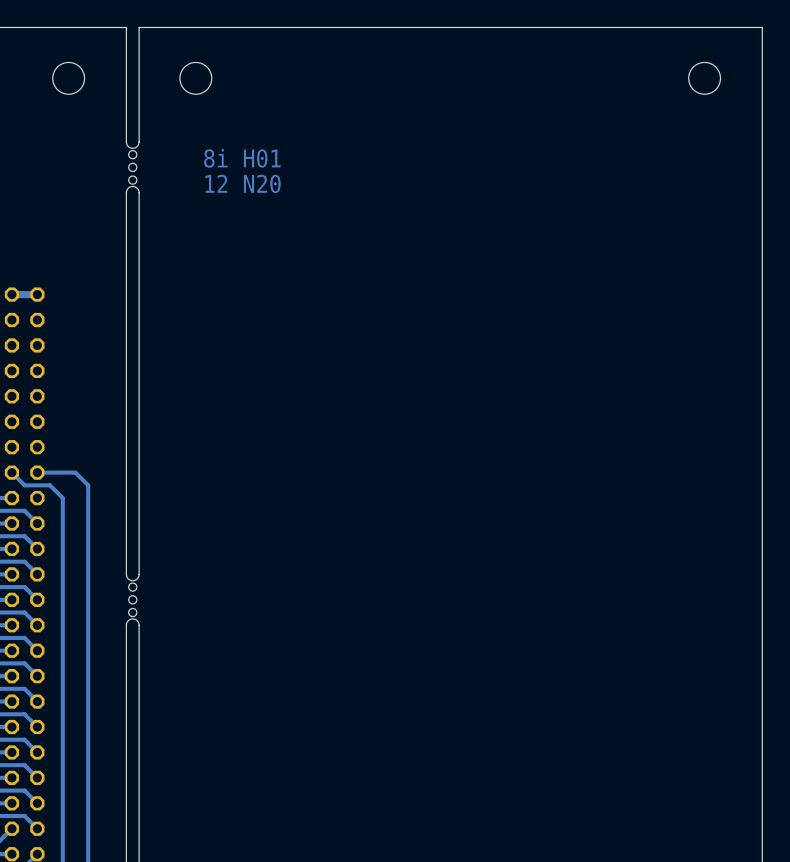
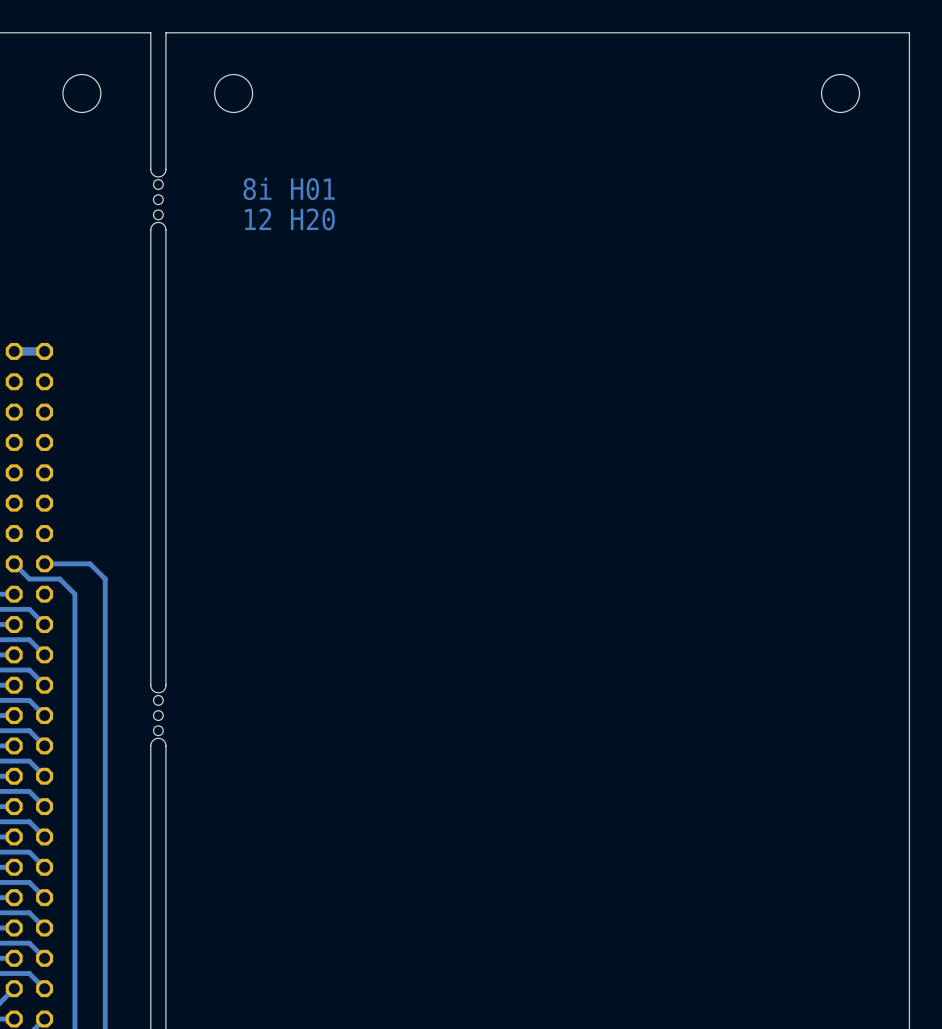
text: 12 N20 (243, 183) -> 12 H20 (289, 219)

